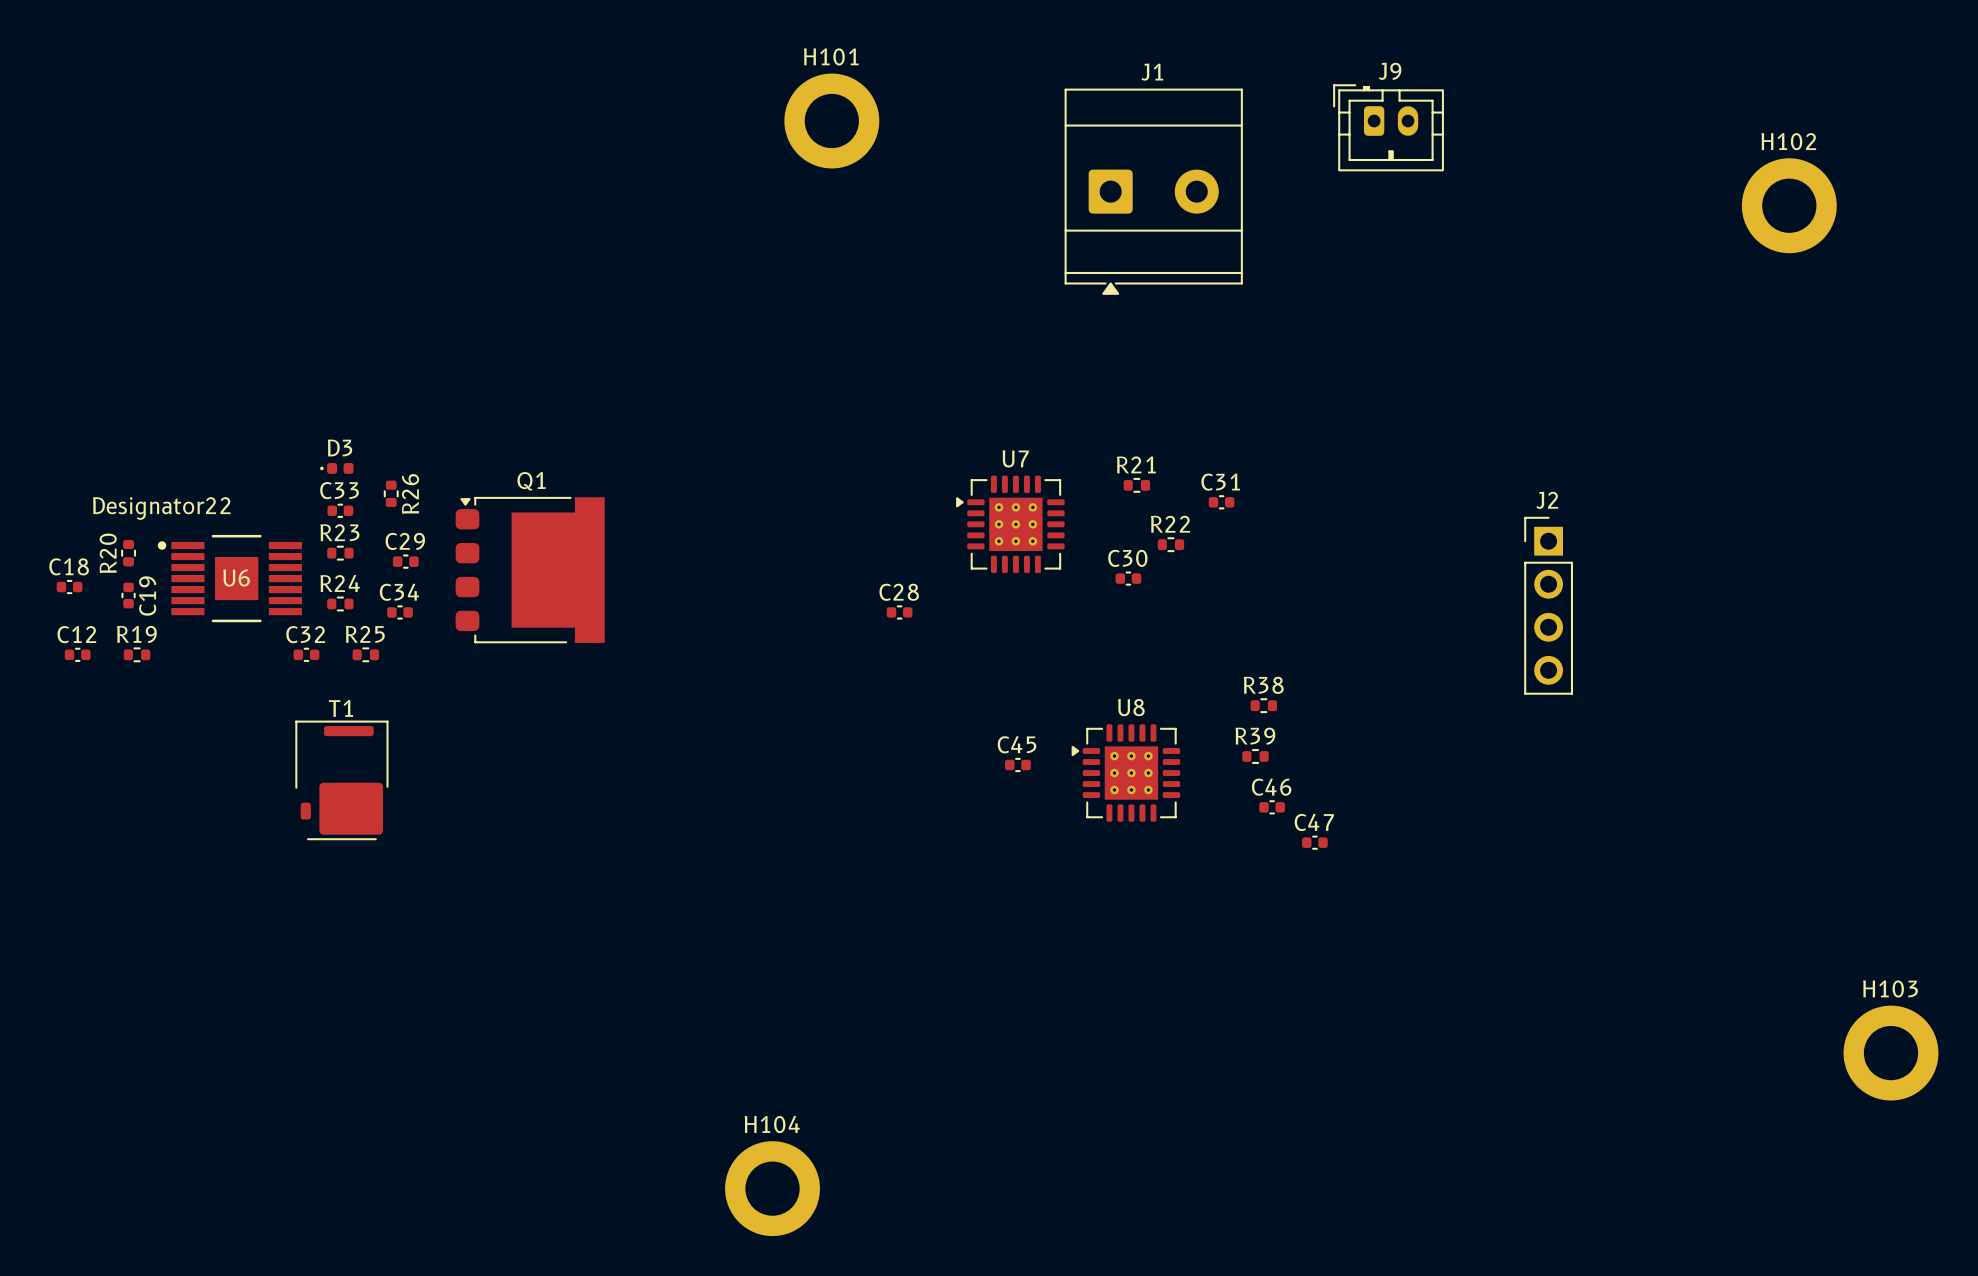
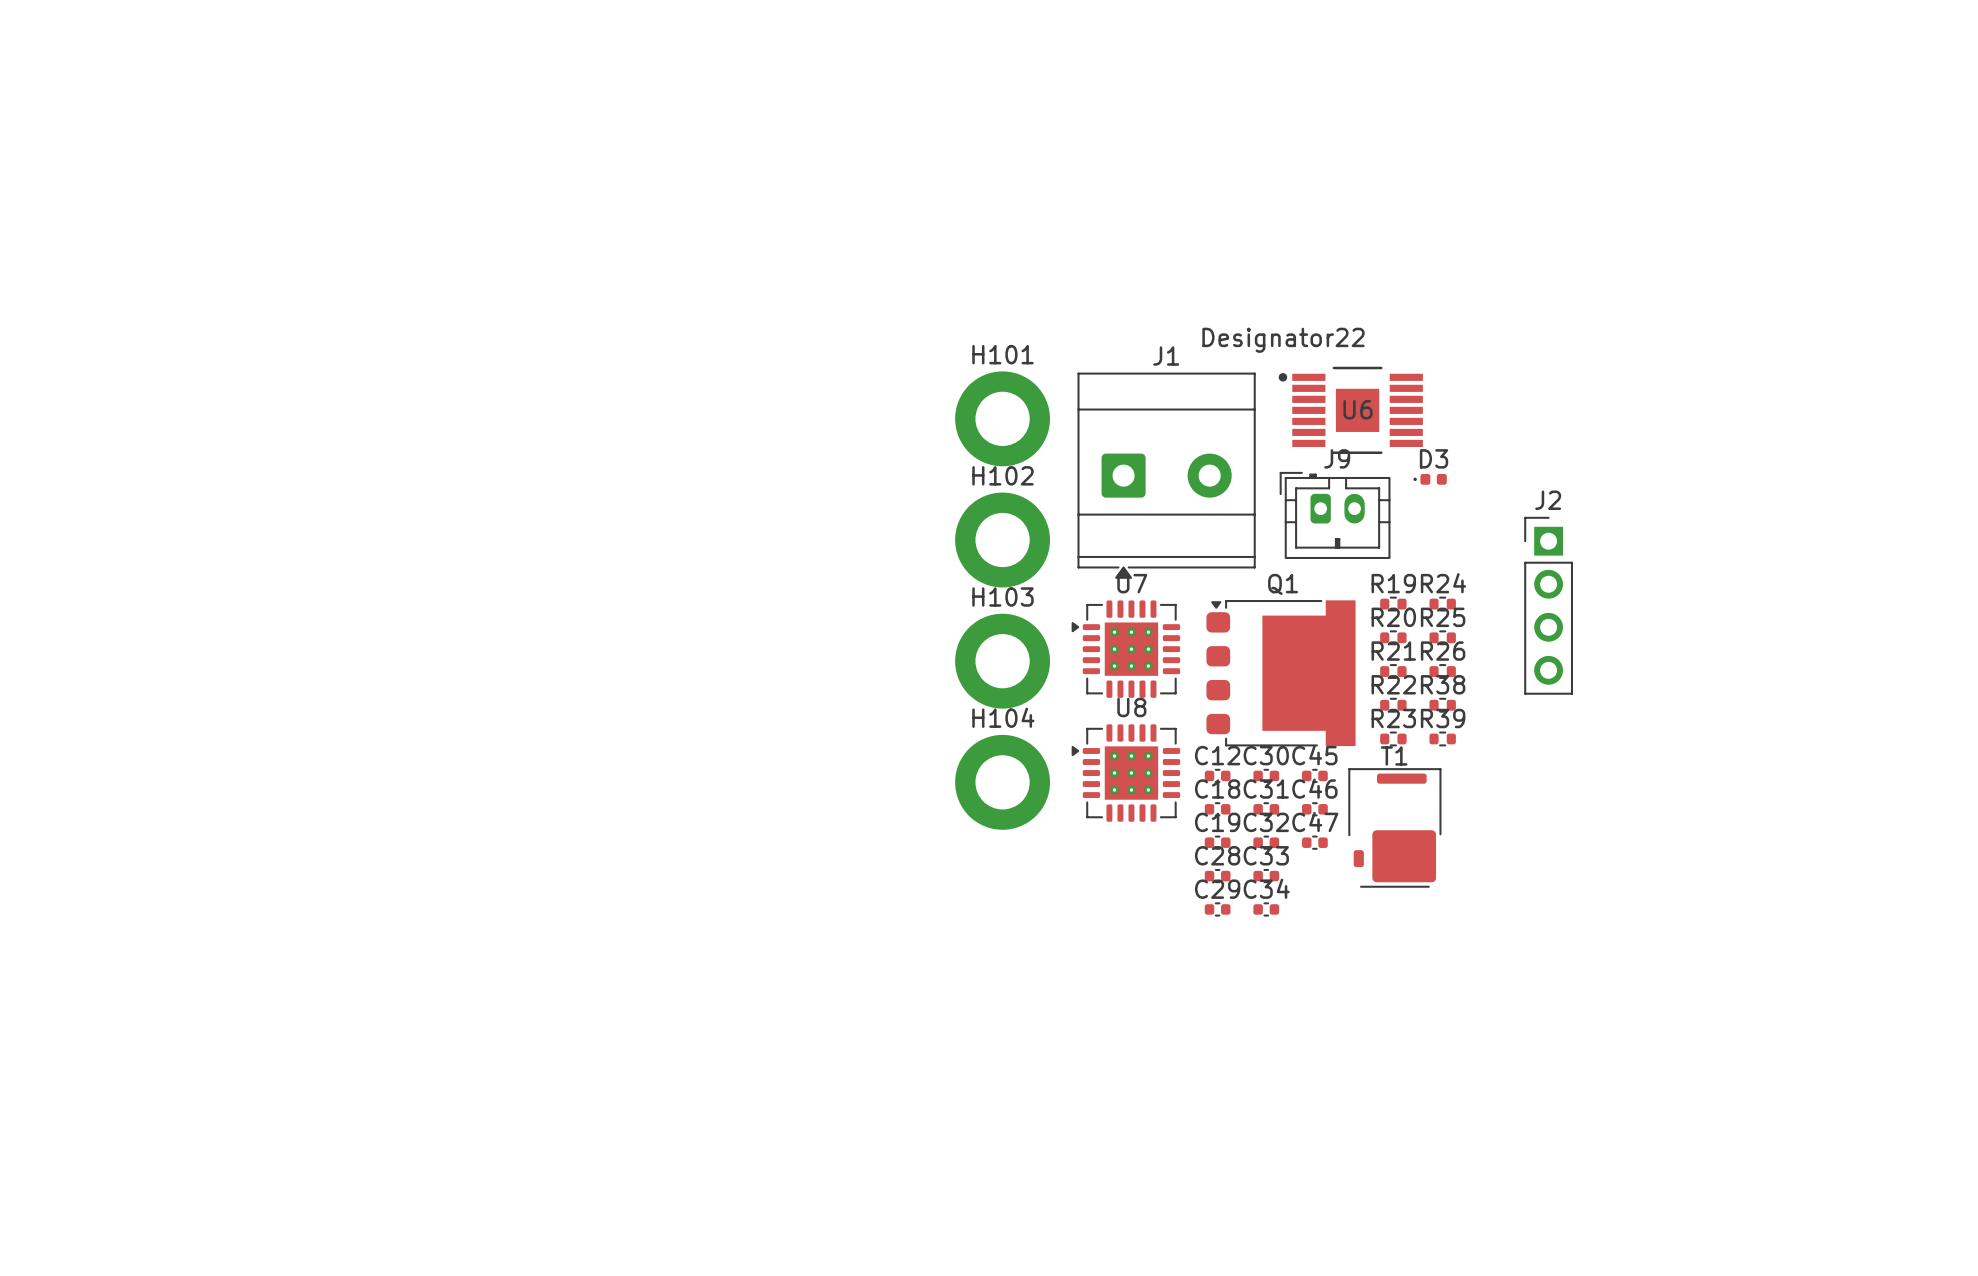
H101 position: (831, 121) -> (1002, 418)
J9 position: (1388, 127) -> (1335, 515)
J1 position: (1153, 191) -> (1166, 475)
H102 position: (1789, 205) -> (1002, 540)
D3 position: (336, 468) -> (1430, 479)
R21 position: (1136, 485) -> (1393, 671)
R26 rotation: 0° (391, 493) -> 90° clockwise (1442, 671)
R26 position: (391, 493) -> (1442, 671)
C31 position: (1221, 502) -> (1266, 809)
C33 position: (340, 510) -> (1266, 876)
U7 position: (1010, 524) -> (1125, 649)
R22 position: (1170, 544) -> (1393, 705)
R20 rotation: 0° (128, 553) -> 90° clockwise (1393, 637)
R20 position: (128, 553) -> (1393, 637)
R23 position: (340, 553) -> (1393, 738)
C29 position: (405, 561) -> (1217, 909)
Q1 position: (530, 570) -> (1281, 673)
U6 position: (229, 578) -> (1350, 410)
C30 position: (1128, 578) -> (1266, 775)
C18 position: (69, 587) -> (1217, 809)
C19 rotation: 0° (128, 595) -> 90° clockwise (1217, 842)
C19 position: (128, 595) -> (1217, 842)
R24 position: (340, 603) -> (1442, 604)
C34 position: (400, 612) -> (1266, 909)
C28 position: (899, 612) -> (1217, 876)
C12 position: (77, 654) -> (1217, 775)
R19 position: (137, 654) -> (1393, 604)
C32 position: (306, 654) -> (1266, 842)
R25 position: (365, 654) -> (1442, 637)
R38 position: (1263, 705) -> (1442, 705)
R39 position: (1255, 756) -> (1442, 738)
C45 position: (1017, 764) -> (1314, 775)
T1 position: (341, 780) -> (1394, 827)
C46 position: (1272, 807) -> (1314, 809)
H103 position: (1891, 1053) -> (1002, 661)
H104 position: (772, 1188) -> (1002, 782)

